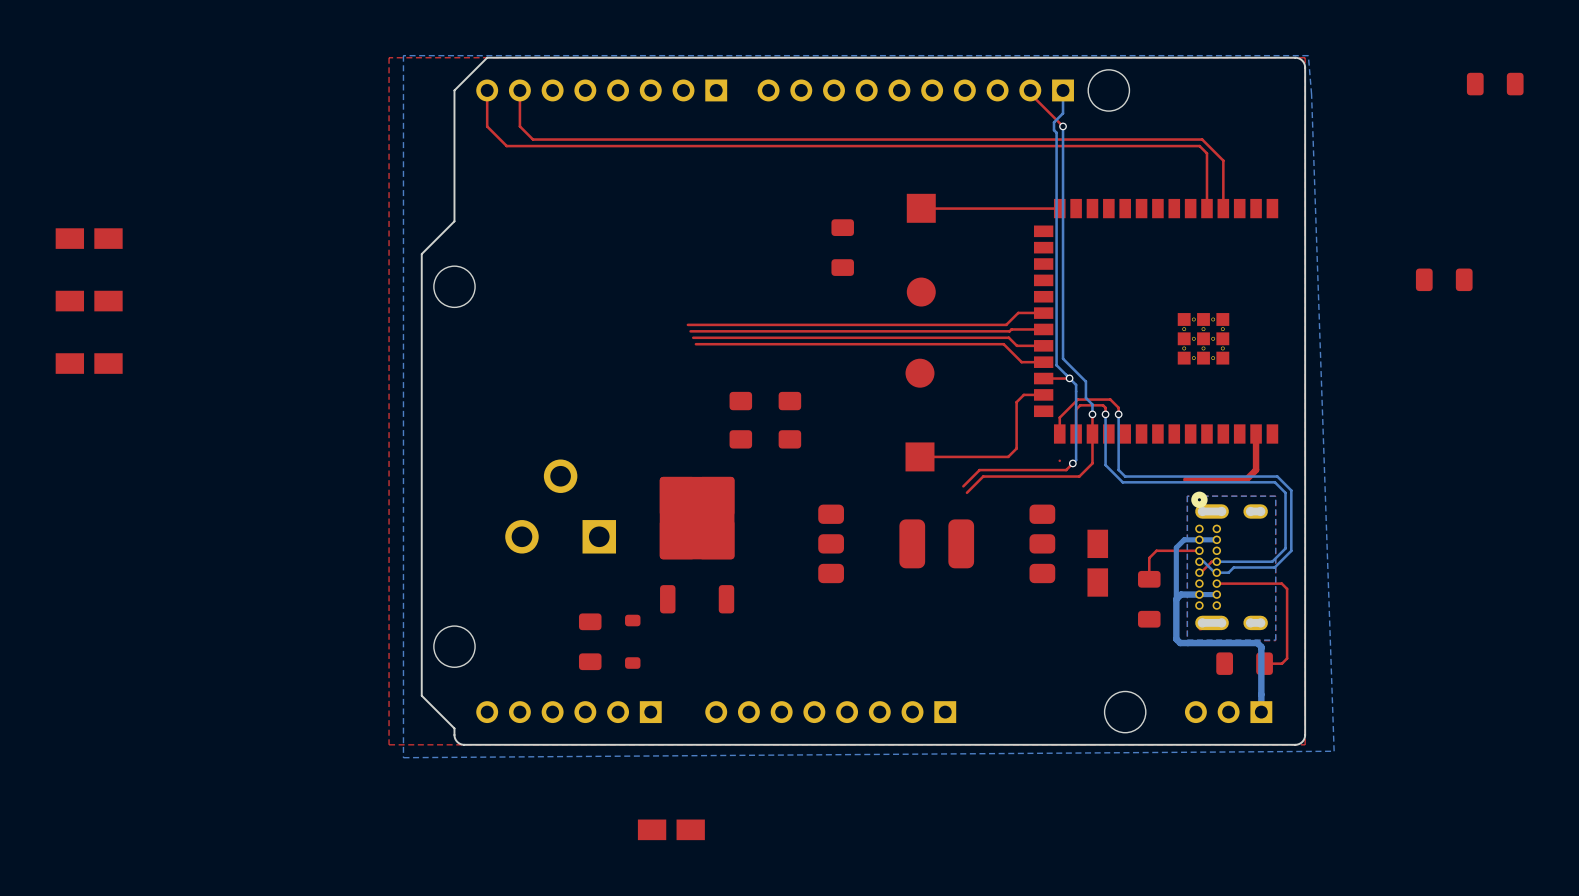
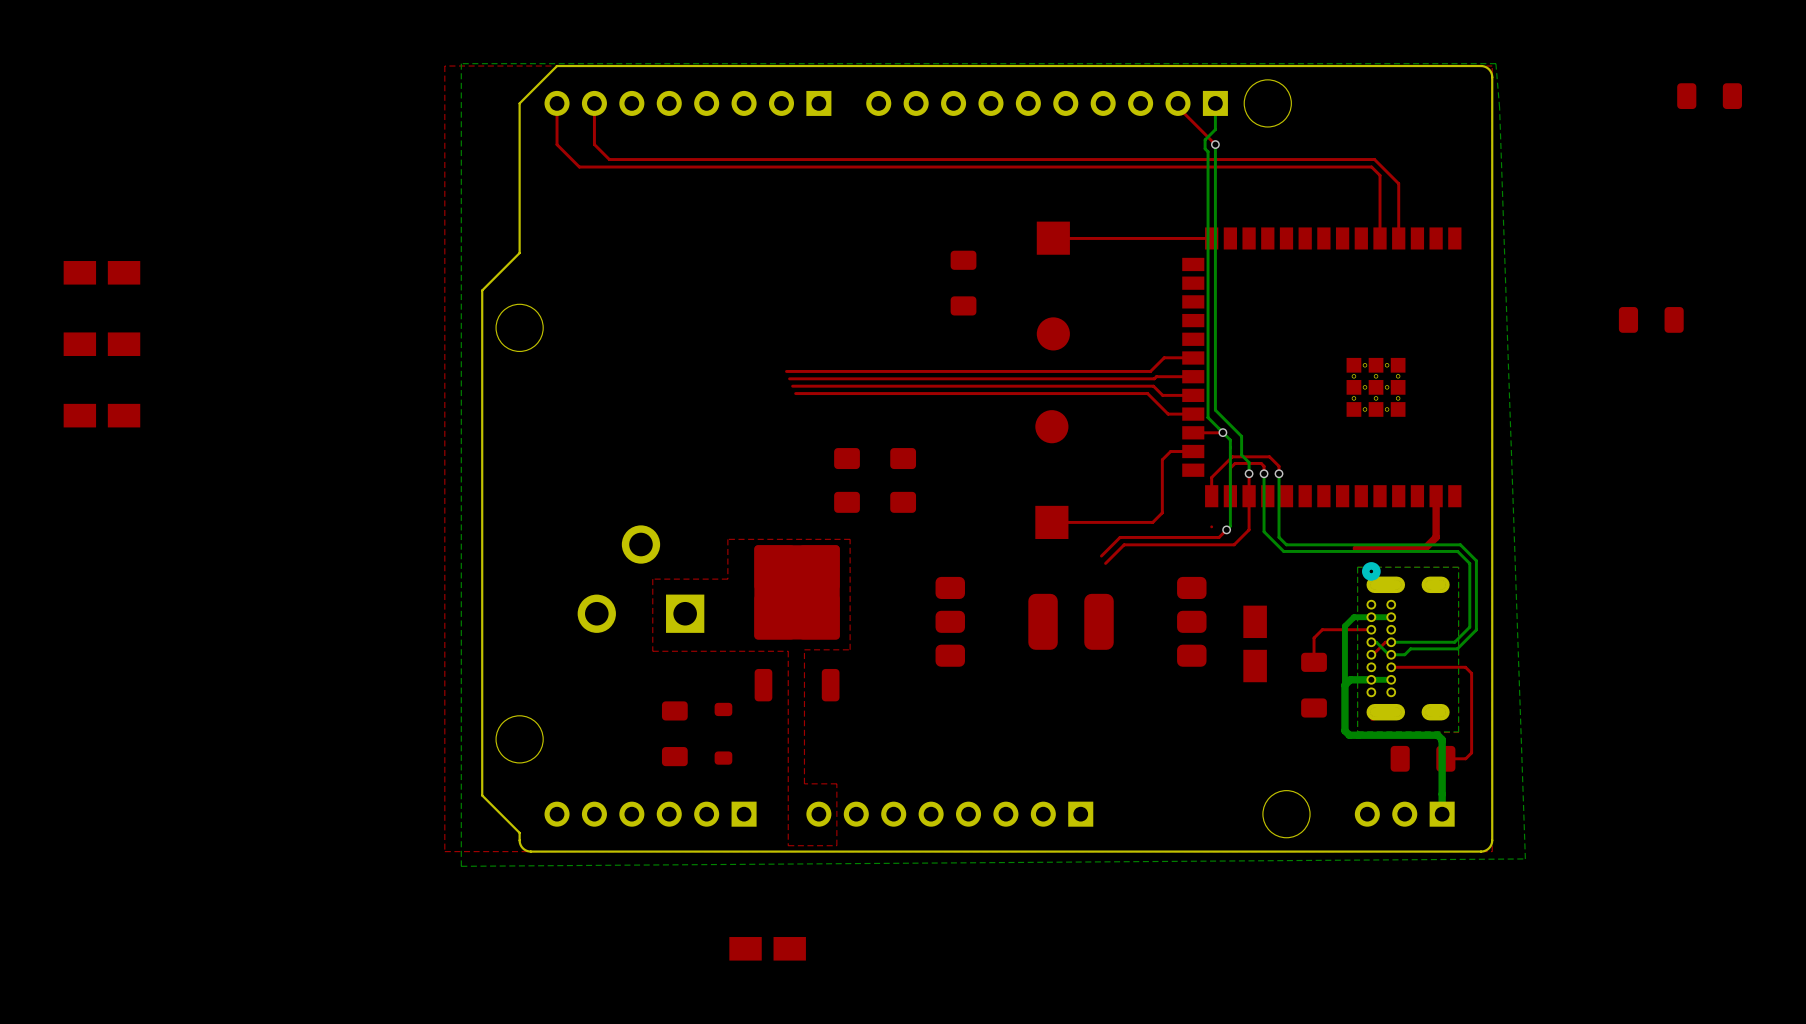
top zone outline: none -> (850, 539) (727, 539) (727, 579) (652, 579) (652, 651) (788, 651) (788, 845) (836, 845) (836, 783) (804, 783) (804, 649) (850, 649) (850, 539)

